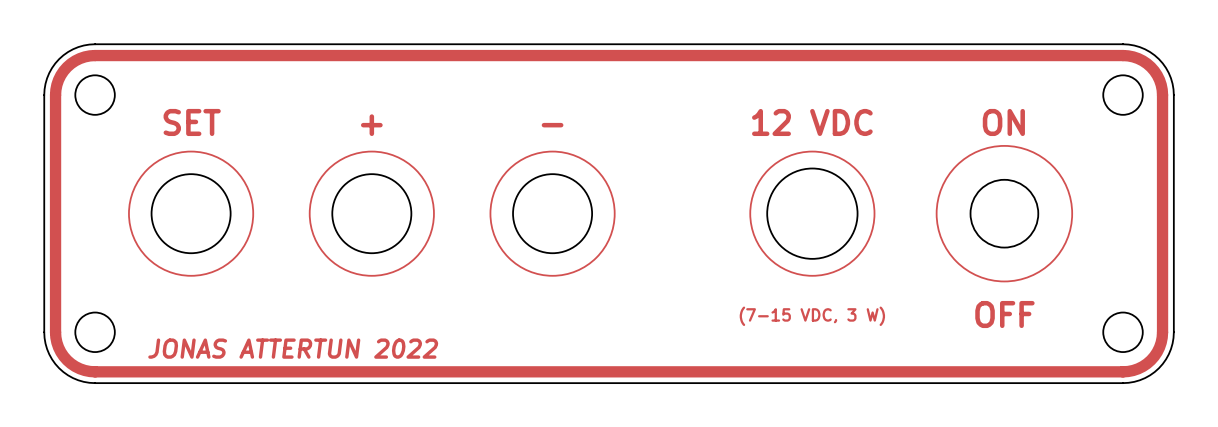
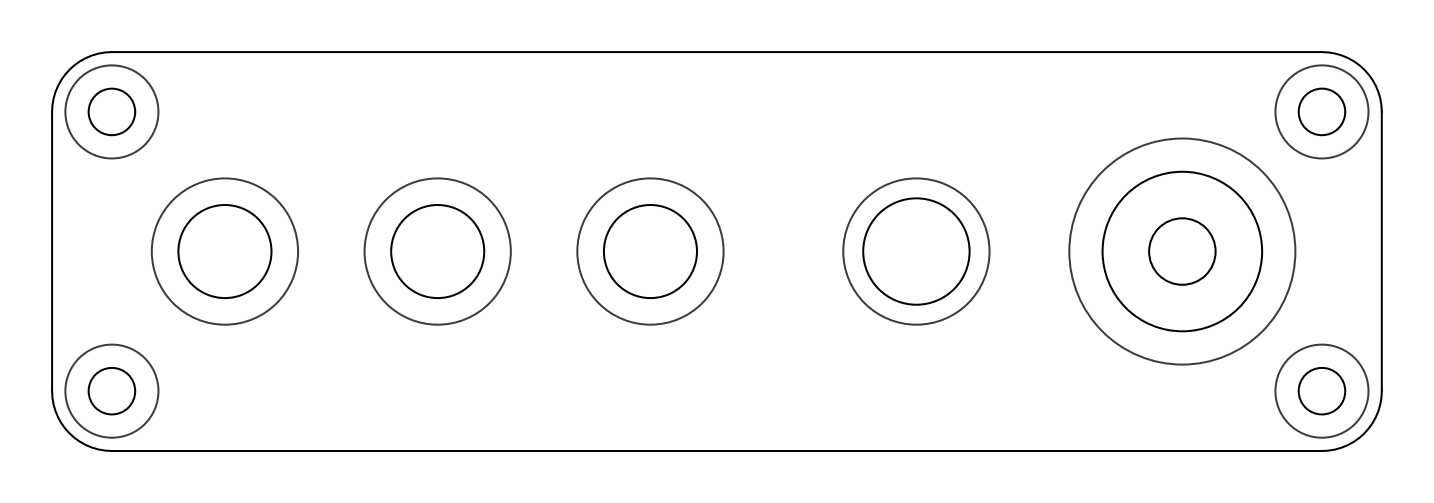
drawing: none -> [64, 64, 160, 160]
drawing: none -> [1274, 64, 1370, 160]
track: (95, 55) (1133, 56) (1150, 67) (1157, 75) (1162, 89) (1161, 342) (1154, 356) (1147, 363) (1133, 370) (1123, 371) (84, 370) (67, 360) (60, 352) (55, 337) (55, 95) (58, 79) (67, 67) (79, 58) (95, 55) -> none
text: SET (192, 122) -> none
text: 12 VDC (812, 122) -> none
text: ON (1003, 122) -> none
text: + (371, 125) -> none
text: - (552, 125) -> none
round board edge: none -> [1101, 170, 1264, 333]
drawing shape: [935, 145, 1074, 283] -> [1068, 137, 1297, 366]
drawing shape: [128, 150, 255, 277] -> [150, 177, 300, 326]
drawing shape: [308, 150, 435, 277] -> [363, 177, 512, 326]
drawing shape: [489, 150, 616, 277] -> [576, 177, 725, 326]
drawing: none -> [842, 177, 991, 326]
drawing: [749, 150, 876, 277] -> none
round board edge: [969, 178, 1040, 249] -> none
round board edge: none -> [1148, 217, 1217, 286]
round board edge position: (812, 213) -> (916, 251)
drawing: none -> [64, 343, 160, 439]
drawing: none -> [1274, 343, 1370, 439]
text: OFF (1004, 314) -> none
text: (7-15 VDC, 3 W) (812, 316) -> none
text: JONAS ATTERTUN 2022 (293, 348) -> none

